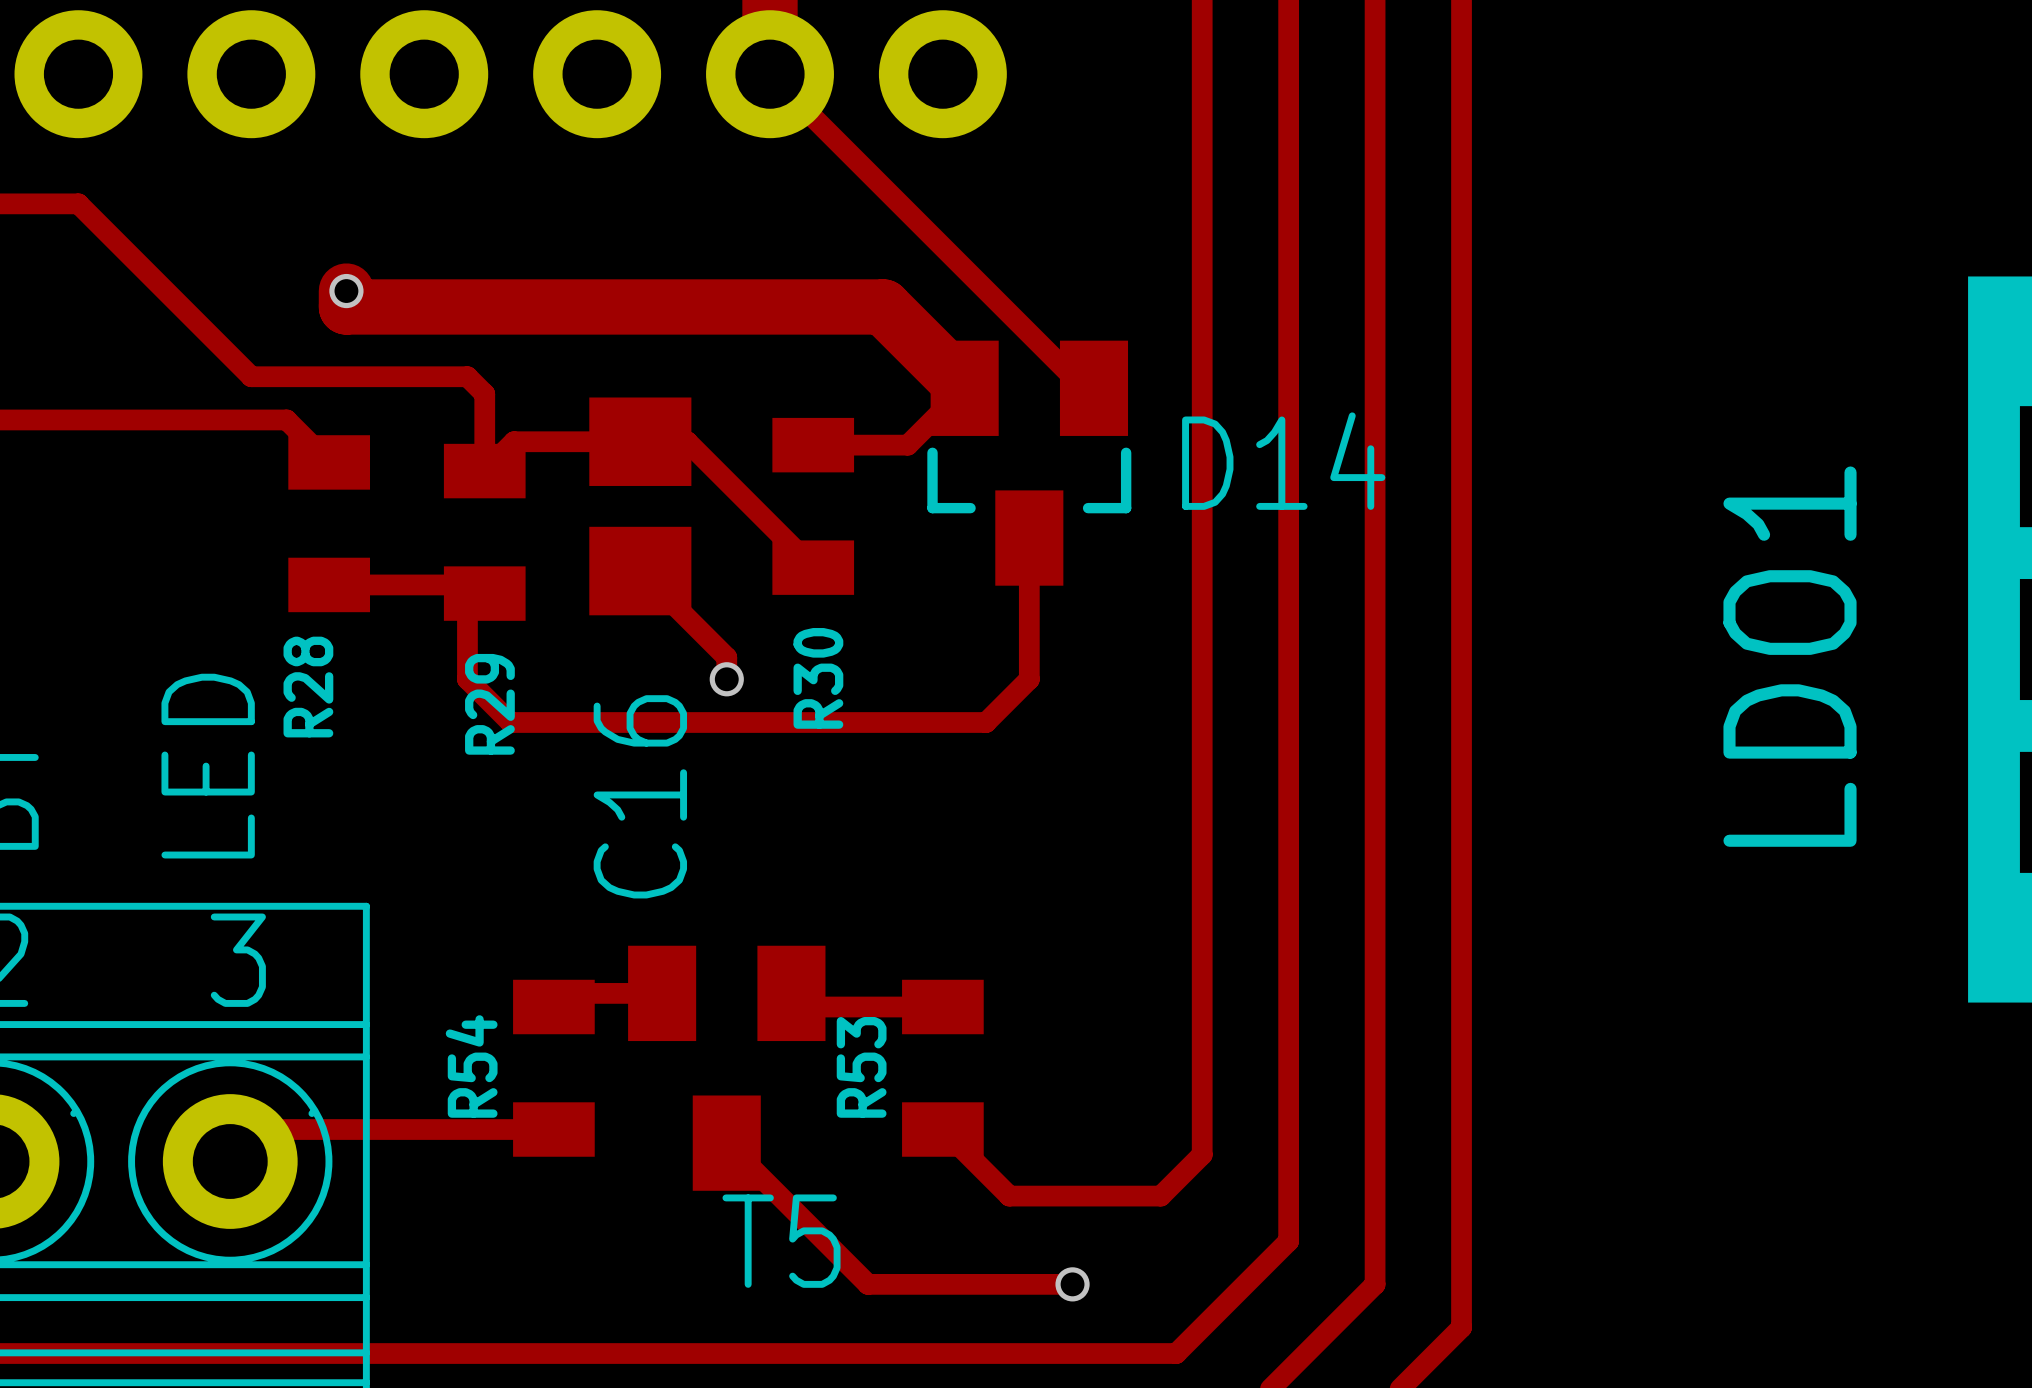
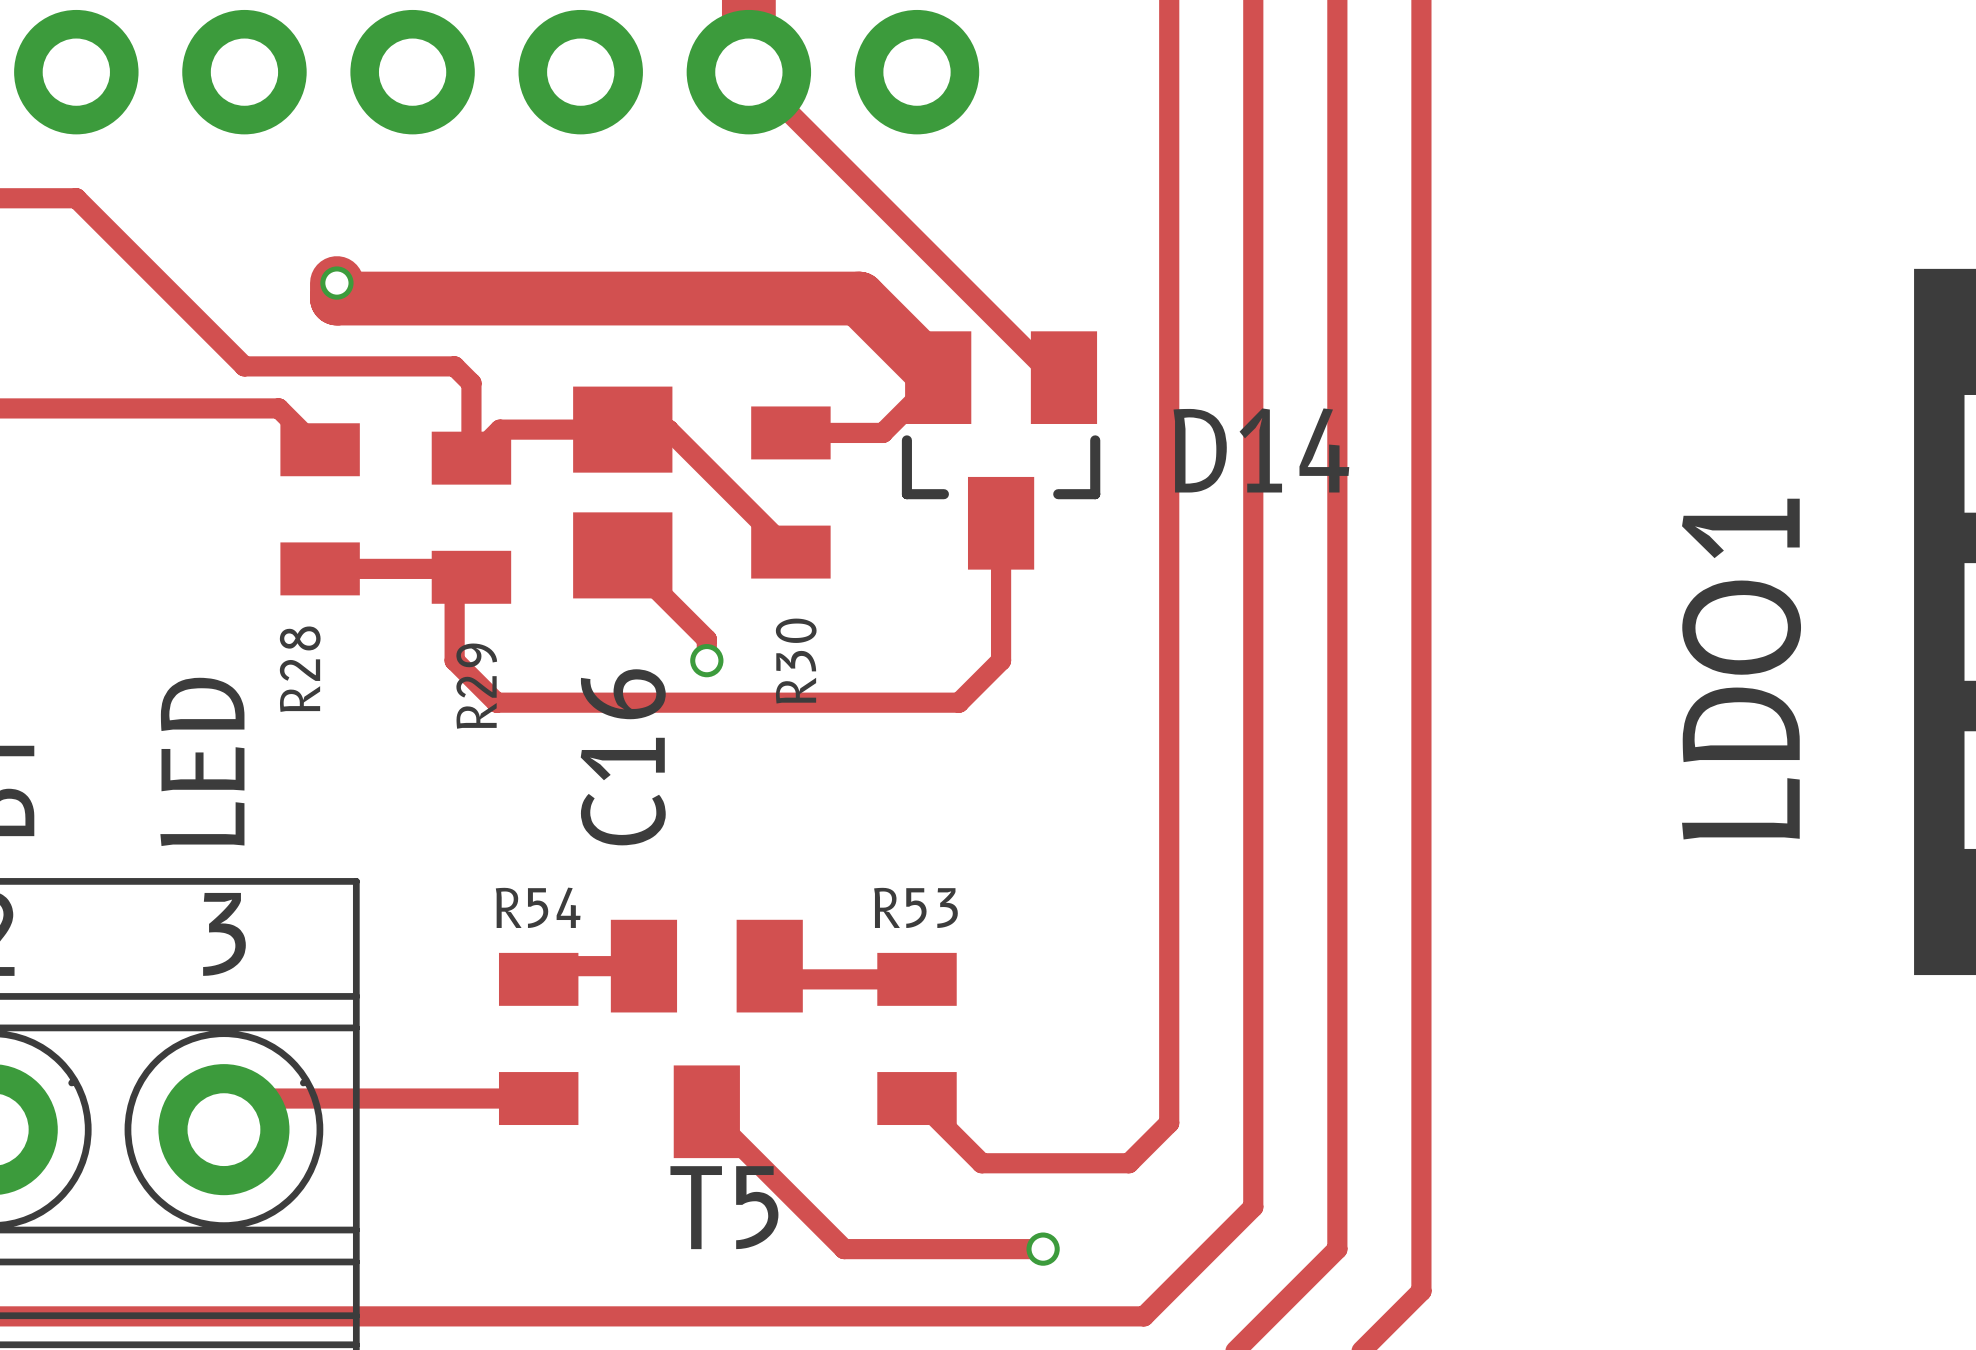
R54 name rotation: 0° (471, 1066) -> 90° clockwise (538, 907)
R54 name position: R54 (471, 1066) -> R54 (538, 907)
R53 name rotation: 0° (861, 1067) -> 90° clockwise (915, 907)
R53 name position: R53 (861, 1067) -> R53 (915, 907)
T5 name position: T5 (781, 1241) -> T5 (724, 1207)

